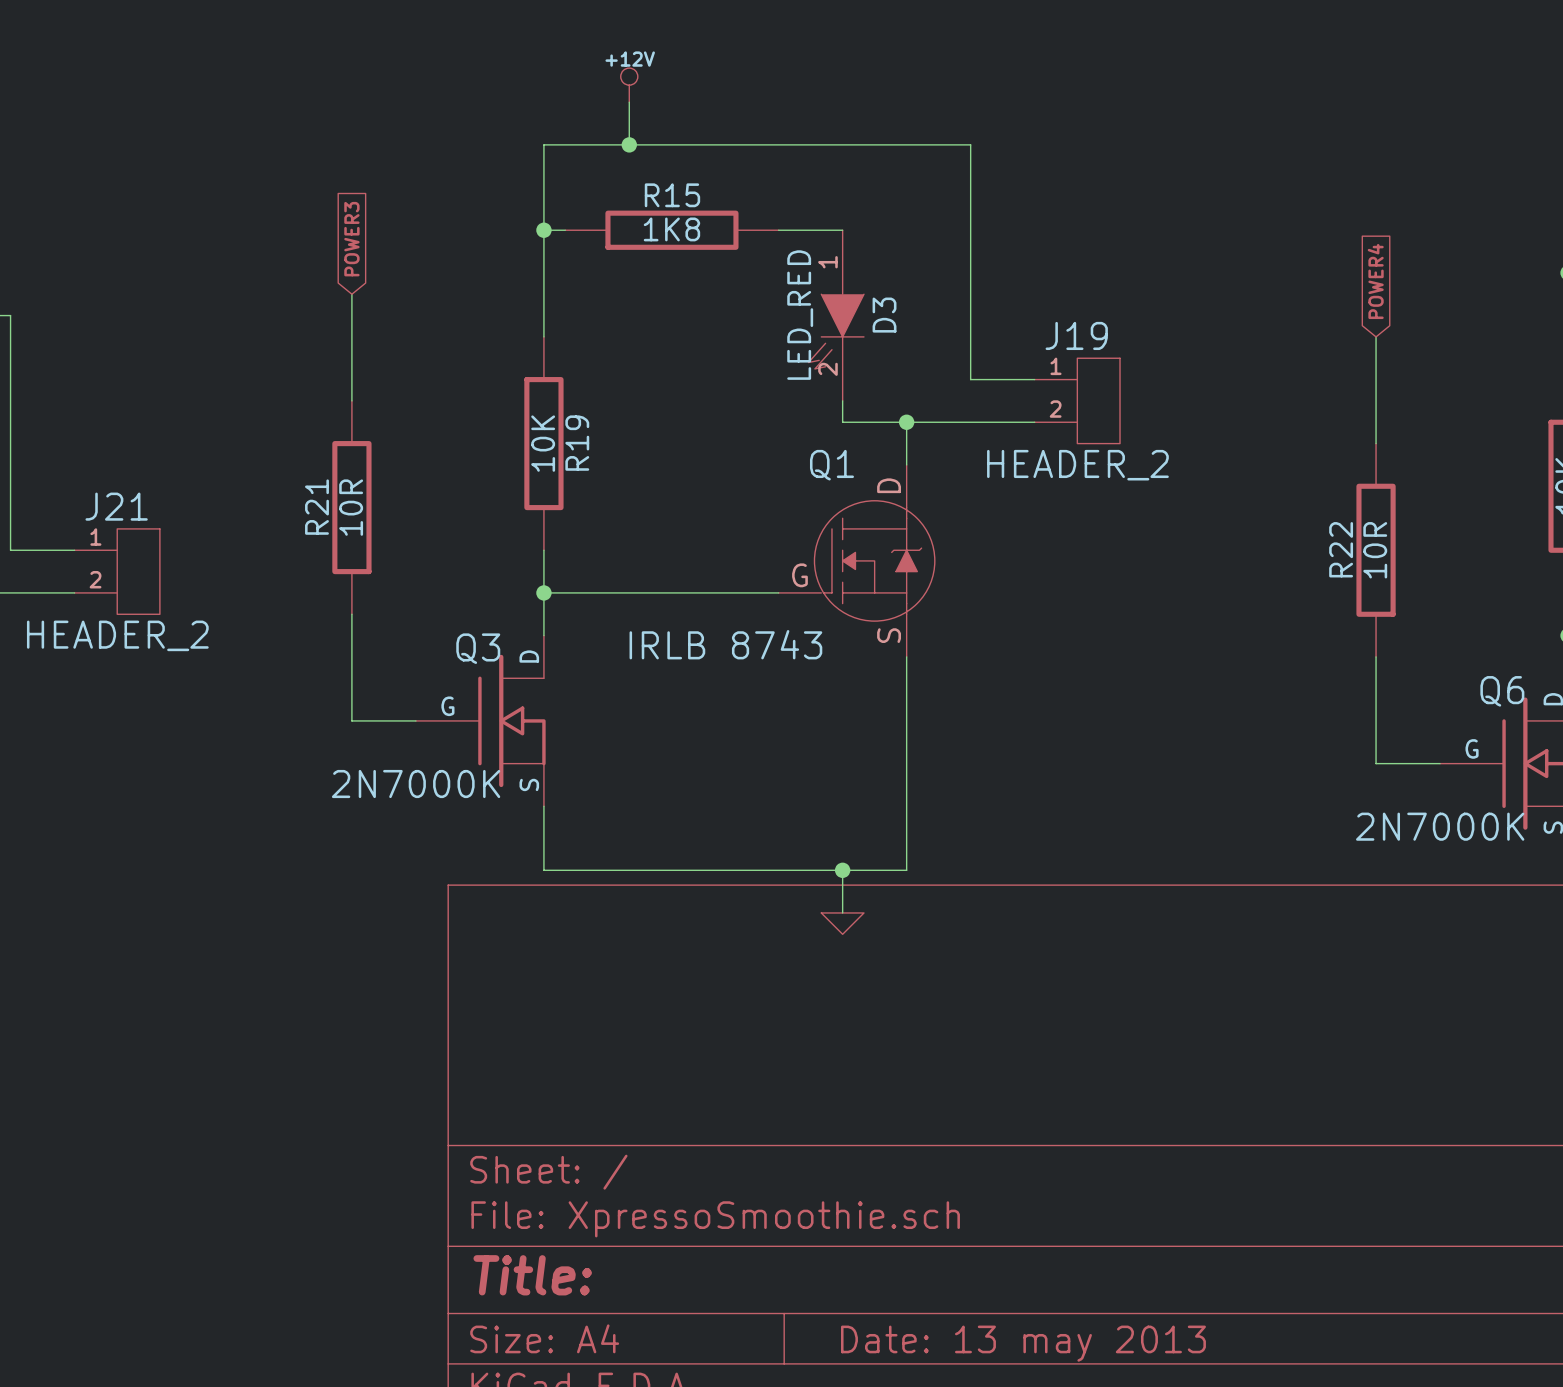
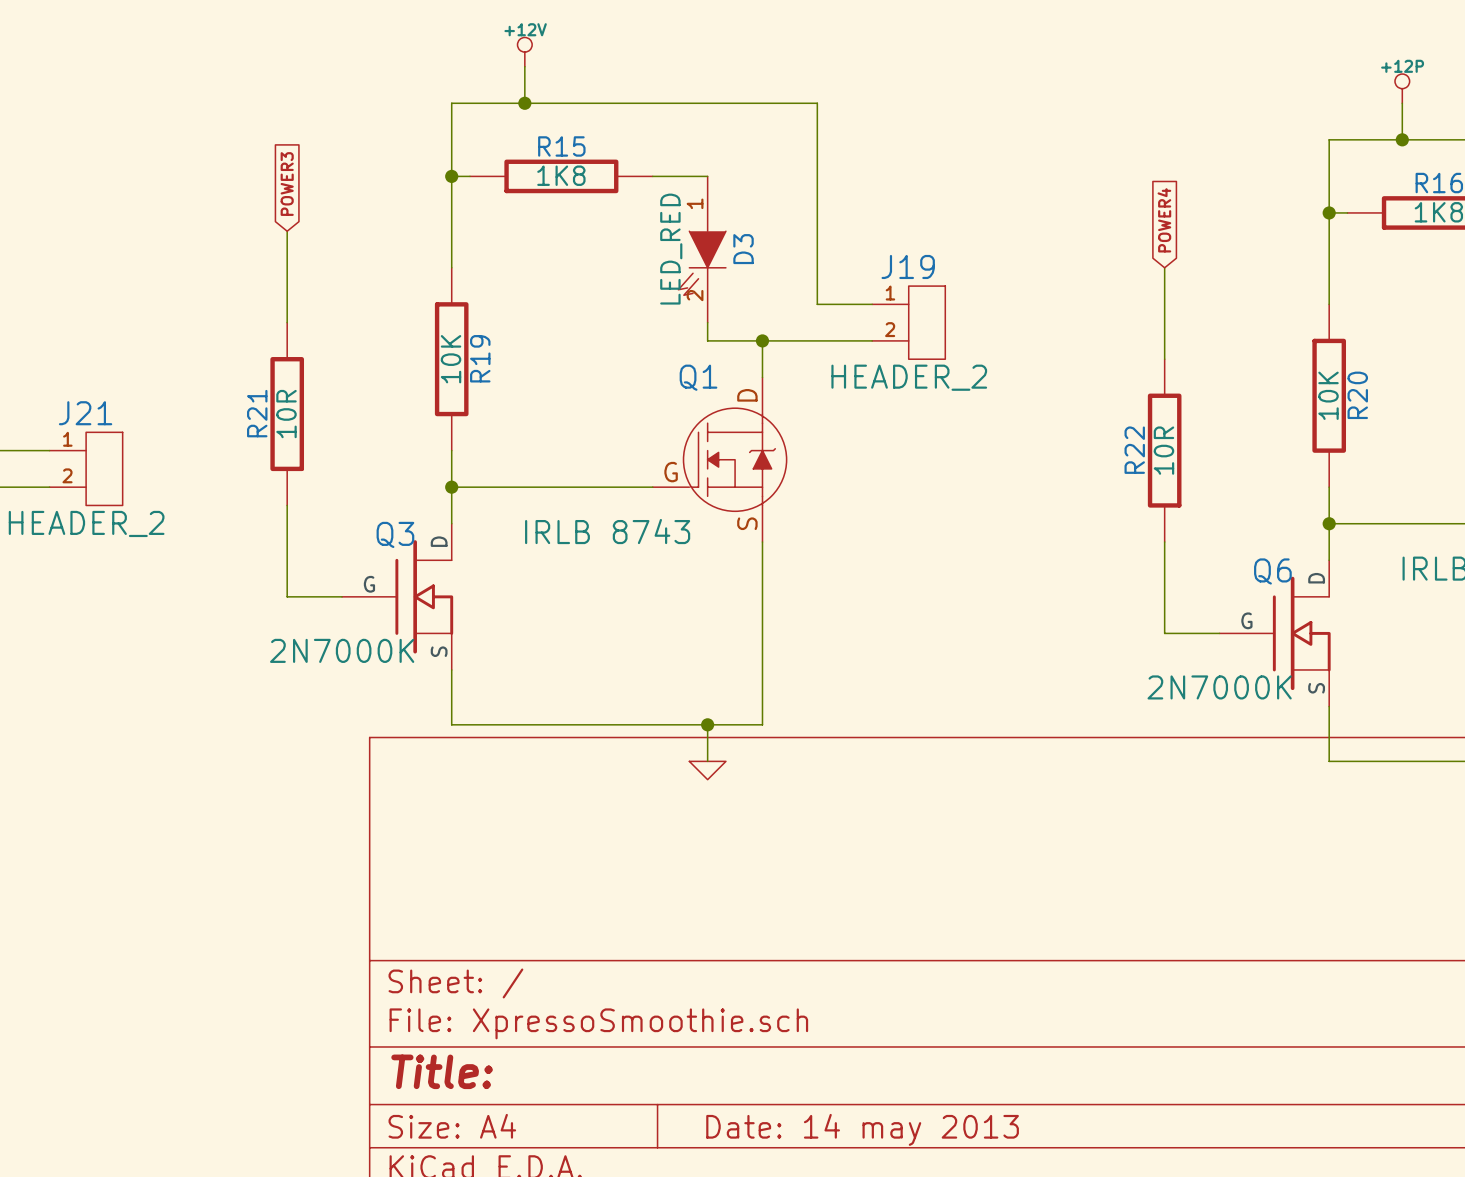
title block: Date: 13 may 2013 (1023, 1343) -> Date: 14 may 2013 (862, 1129)

